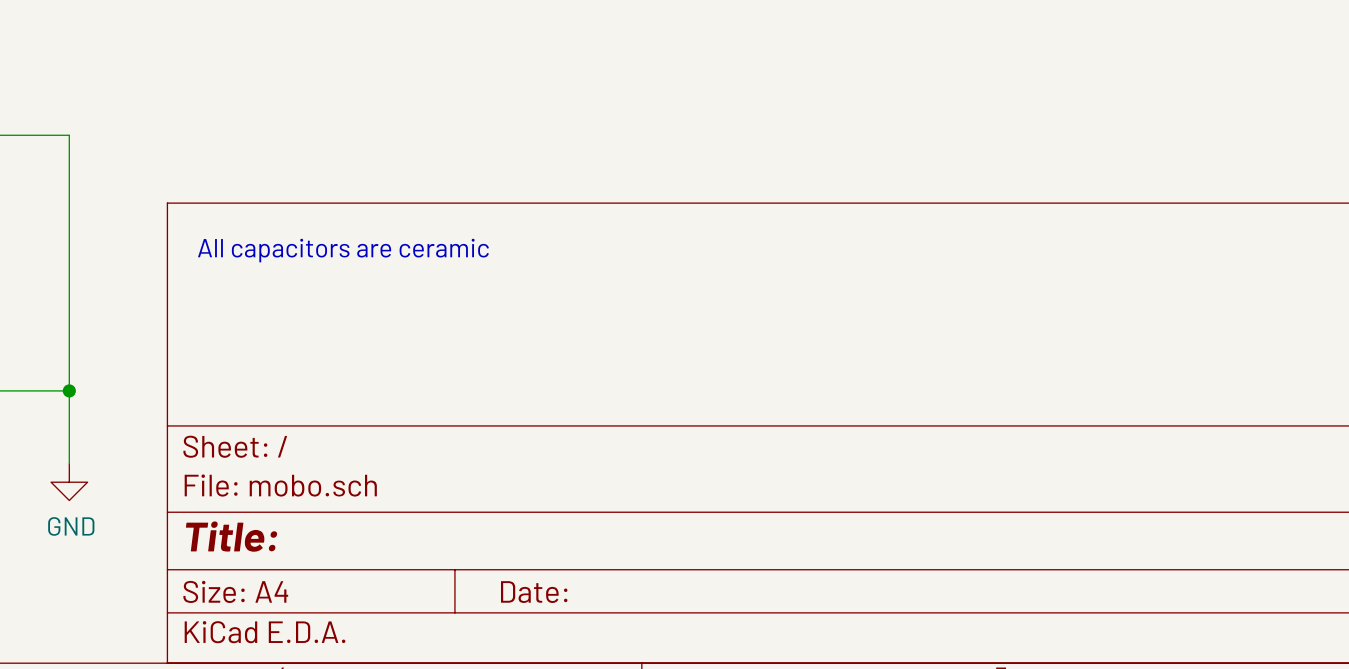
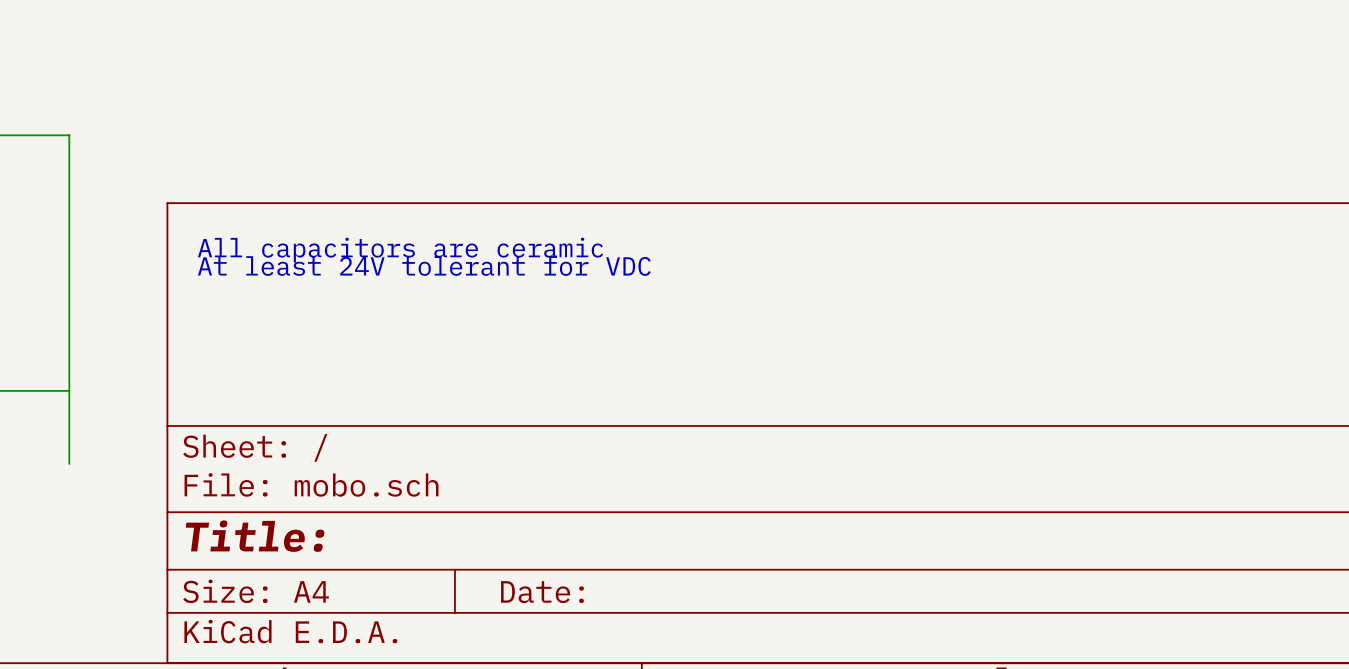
text: none -> At least 24V tolerant for VDC (424, 266)
junction: (69, 390) -> none
power symbol: GND (69, 482) -> none

